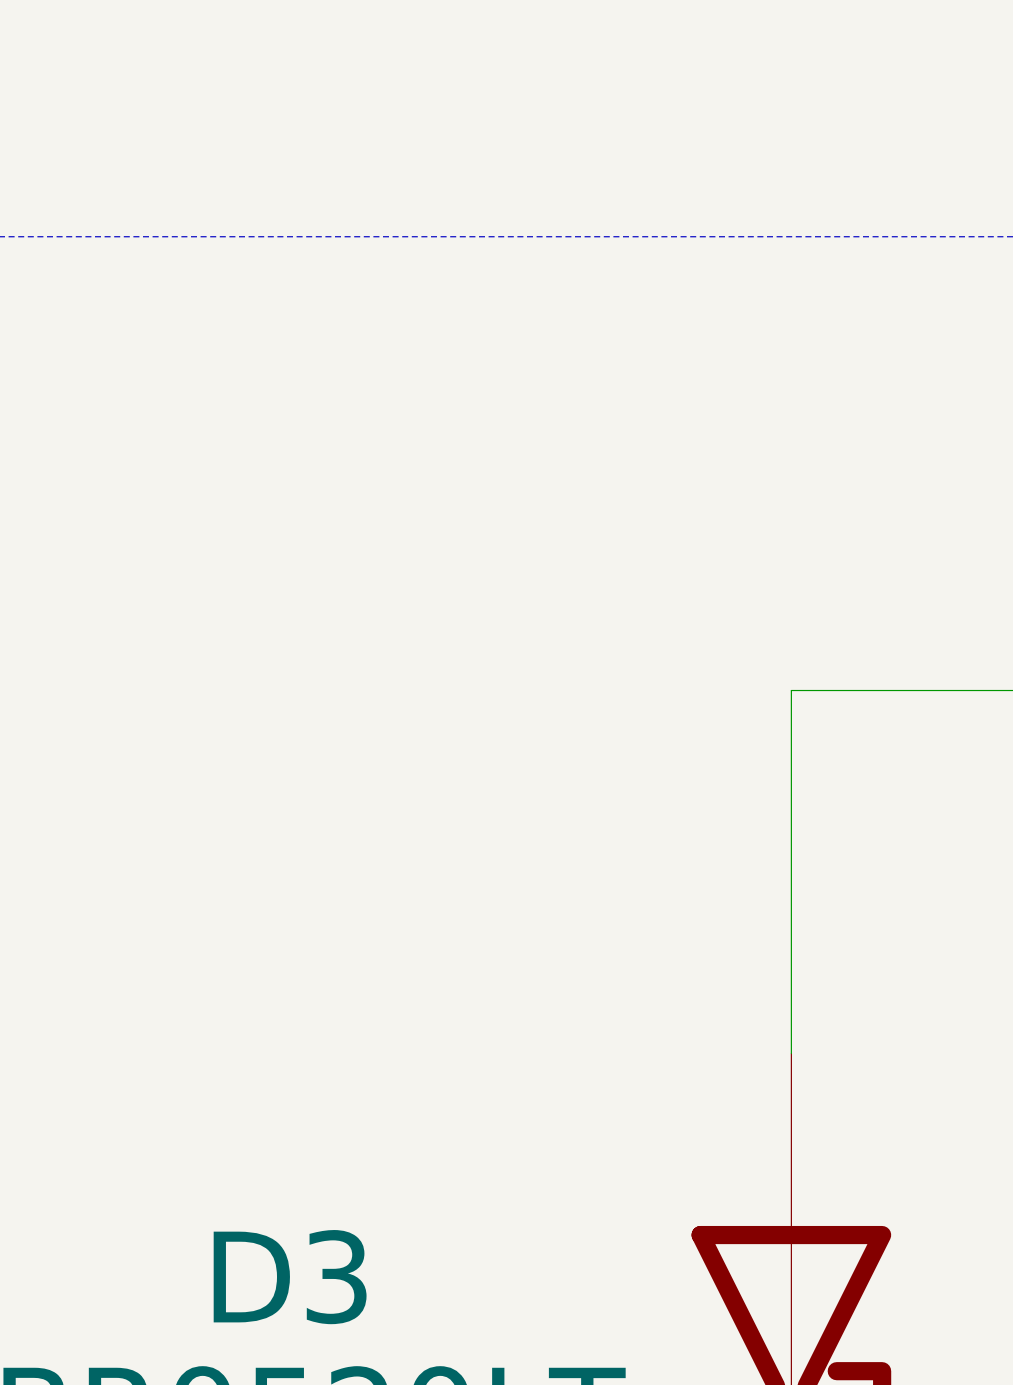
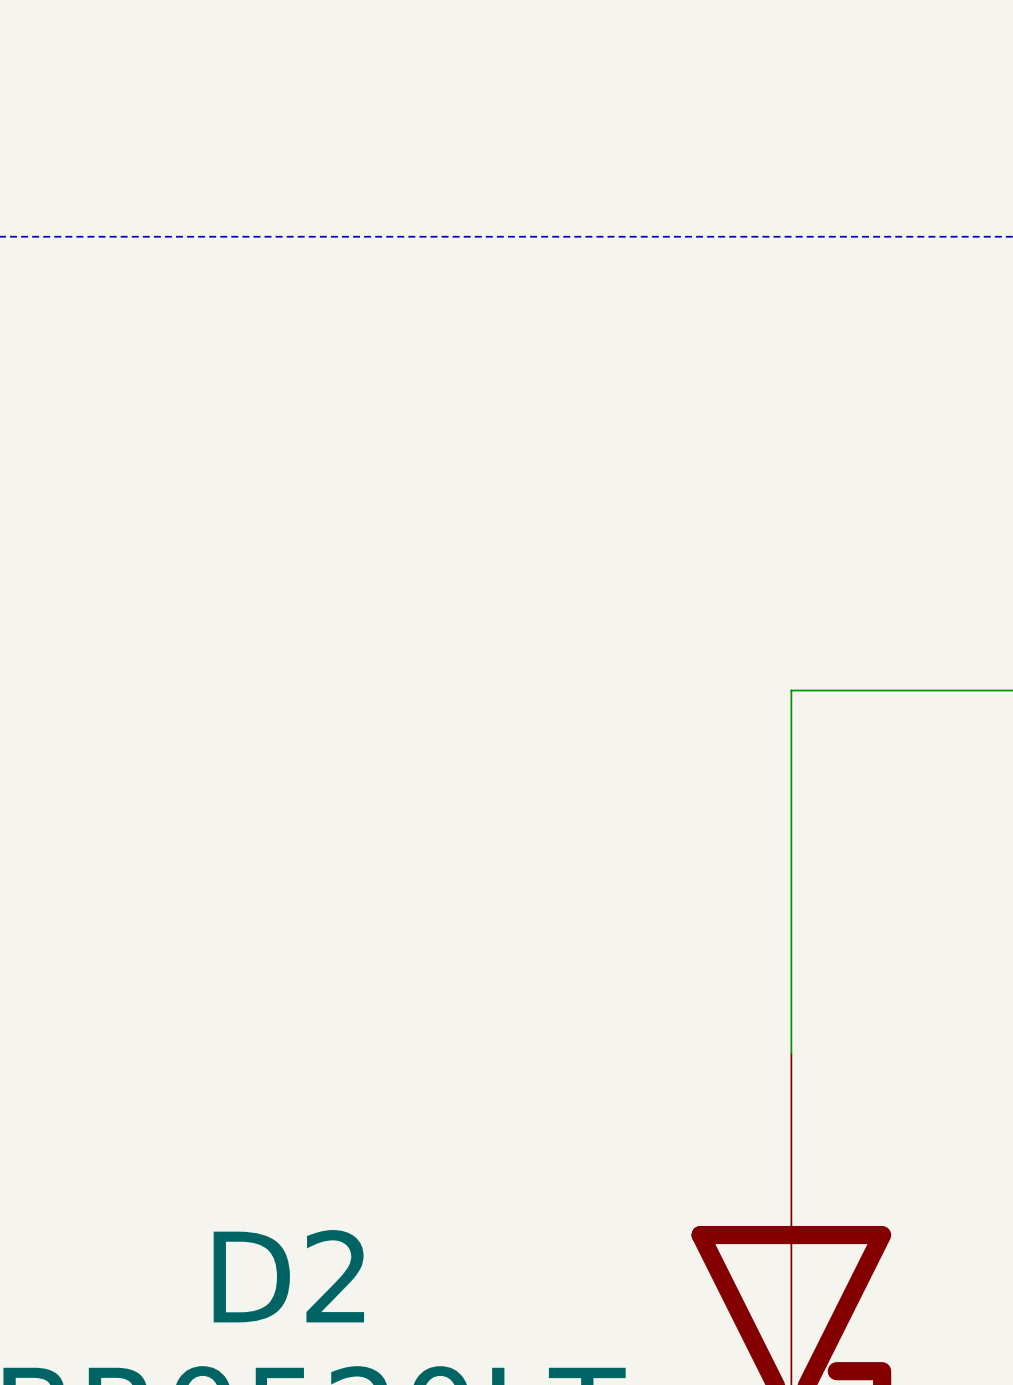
D3 name: D3 (290, 1277) -> D2 (288, 1276)

